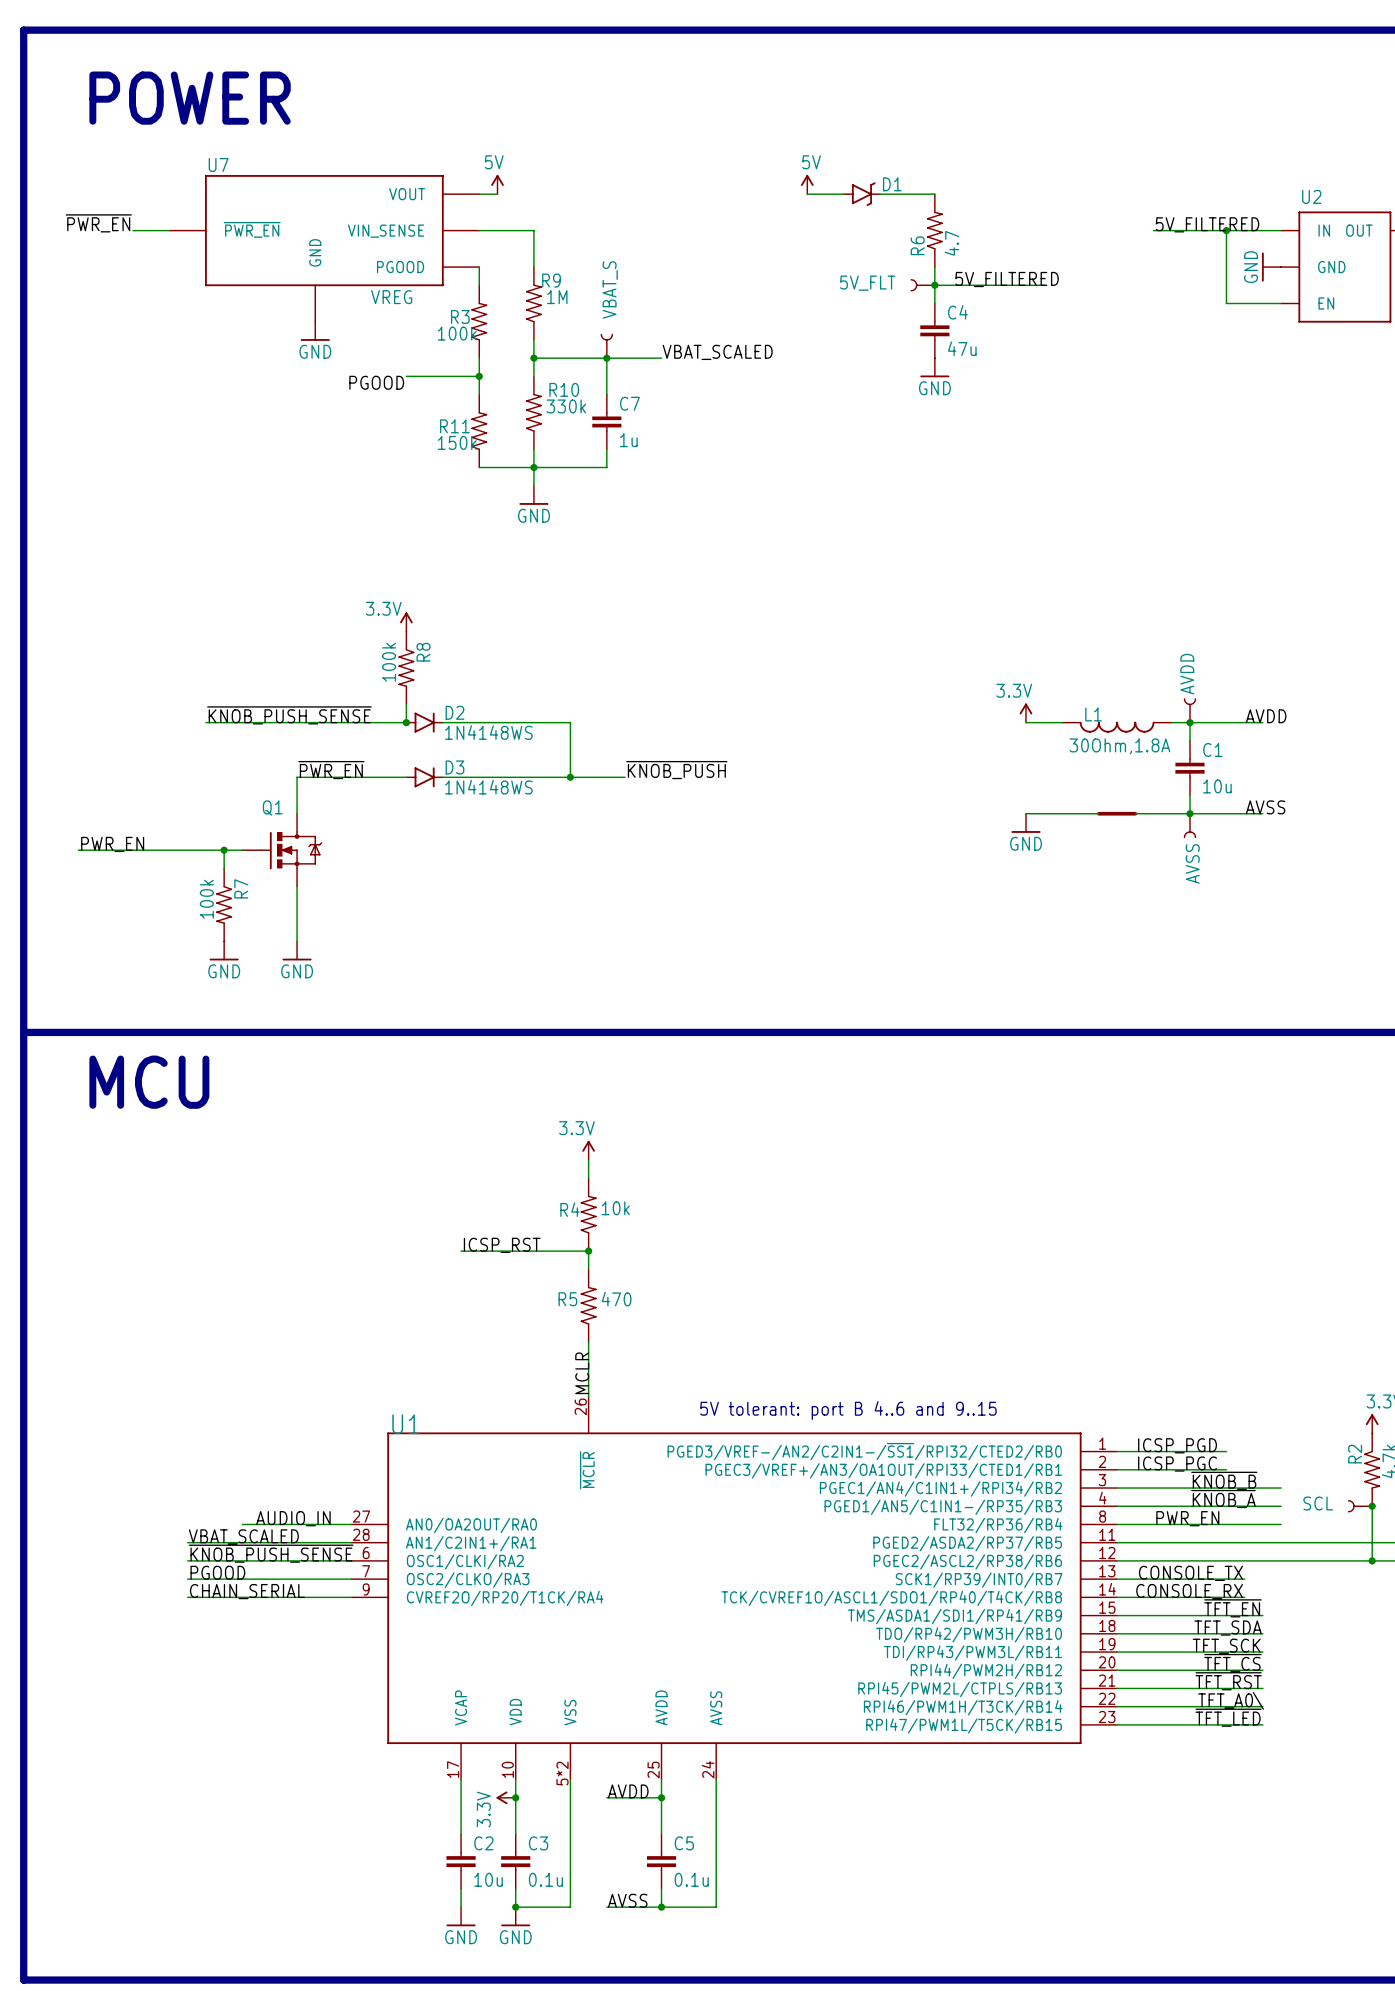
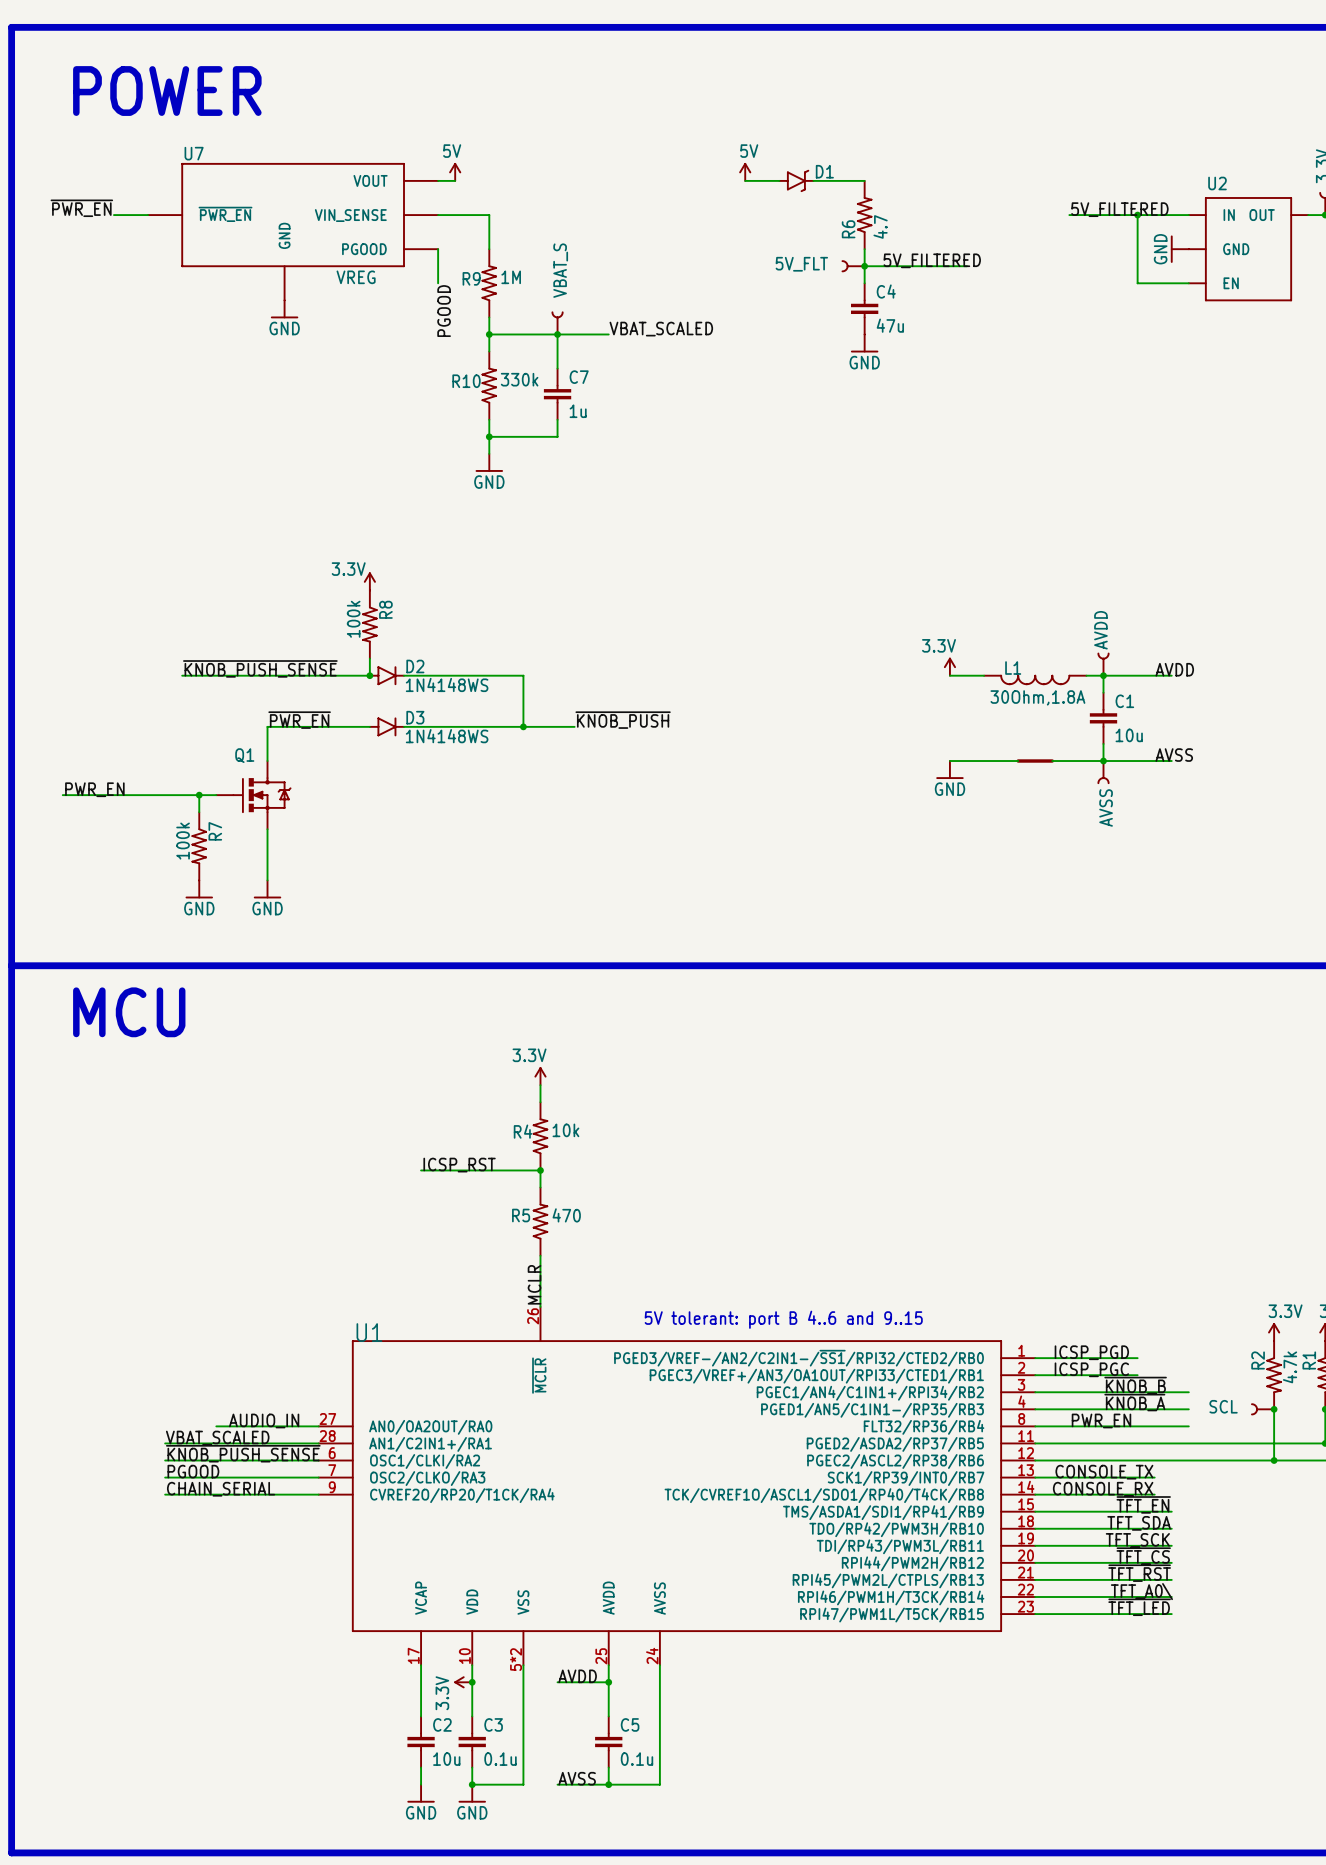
R9 name position: R9 (551, 280) -> R9 (471, 278)
R3: 100k (479, 321) -> none
wire: (479, 358) (479, 394) -> none
wire: (406, 376) (479, 376) -> none
junction: (479, 376) -> none
label rotation: 0° (376, 382) -> 90° counterclockwise (444, 311)
label position: PGOOD (376, 382) -> PGOOD (444, 311)
R10 name position: R10 (564, 389) -> R10 (466, 381)
R11: 150k (479, 431) -> none
wire: (479, 467) (533, 467) -> none

